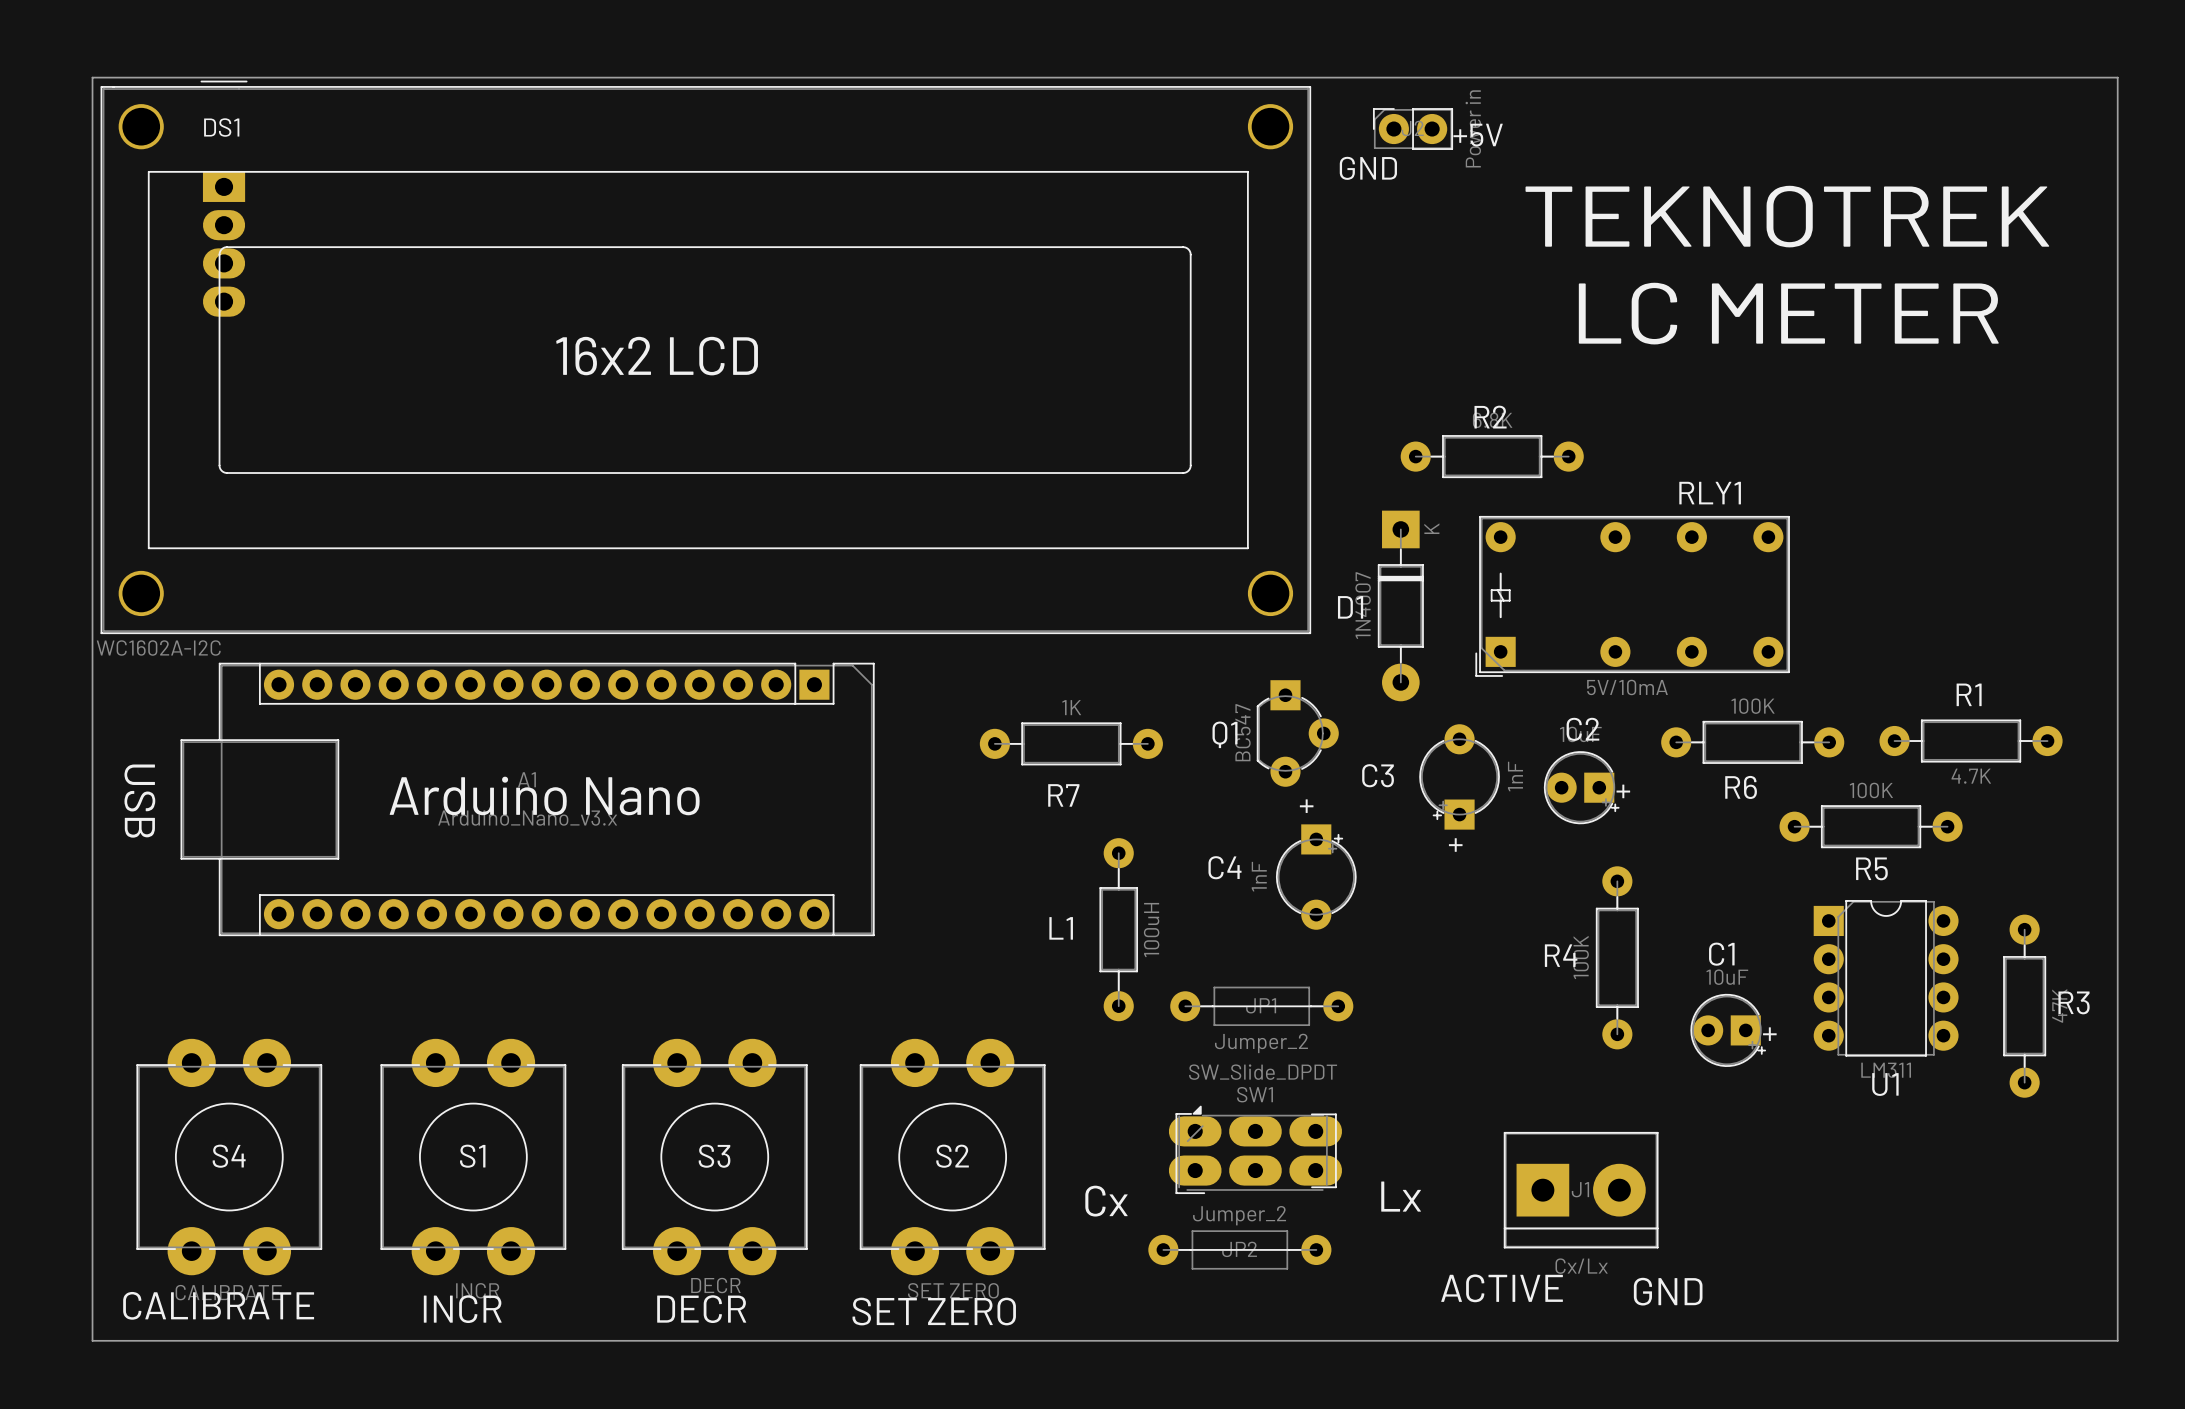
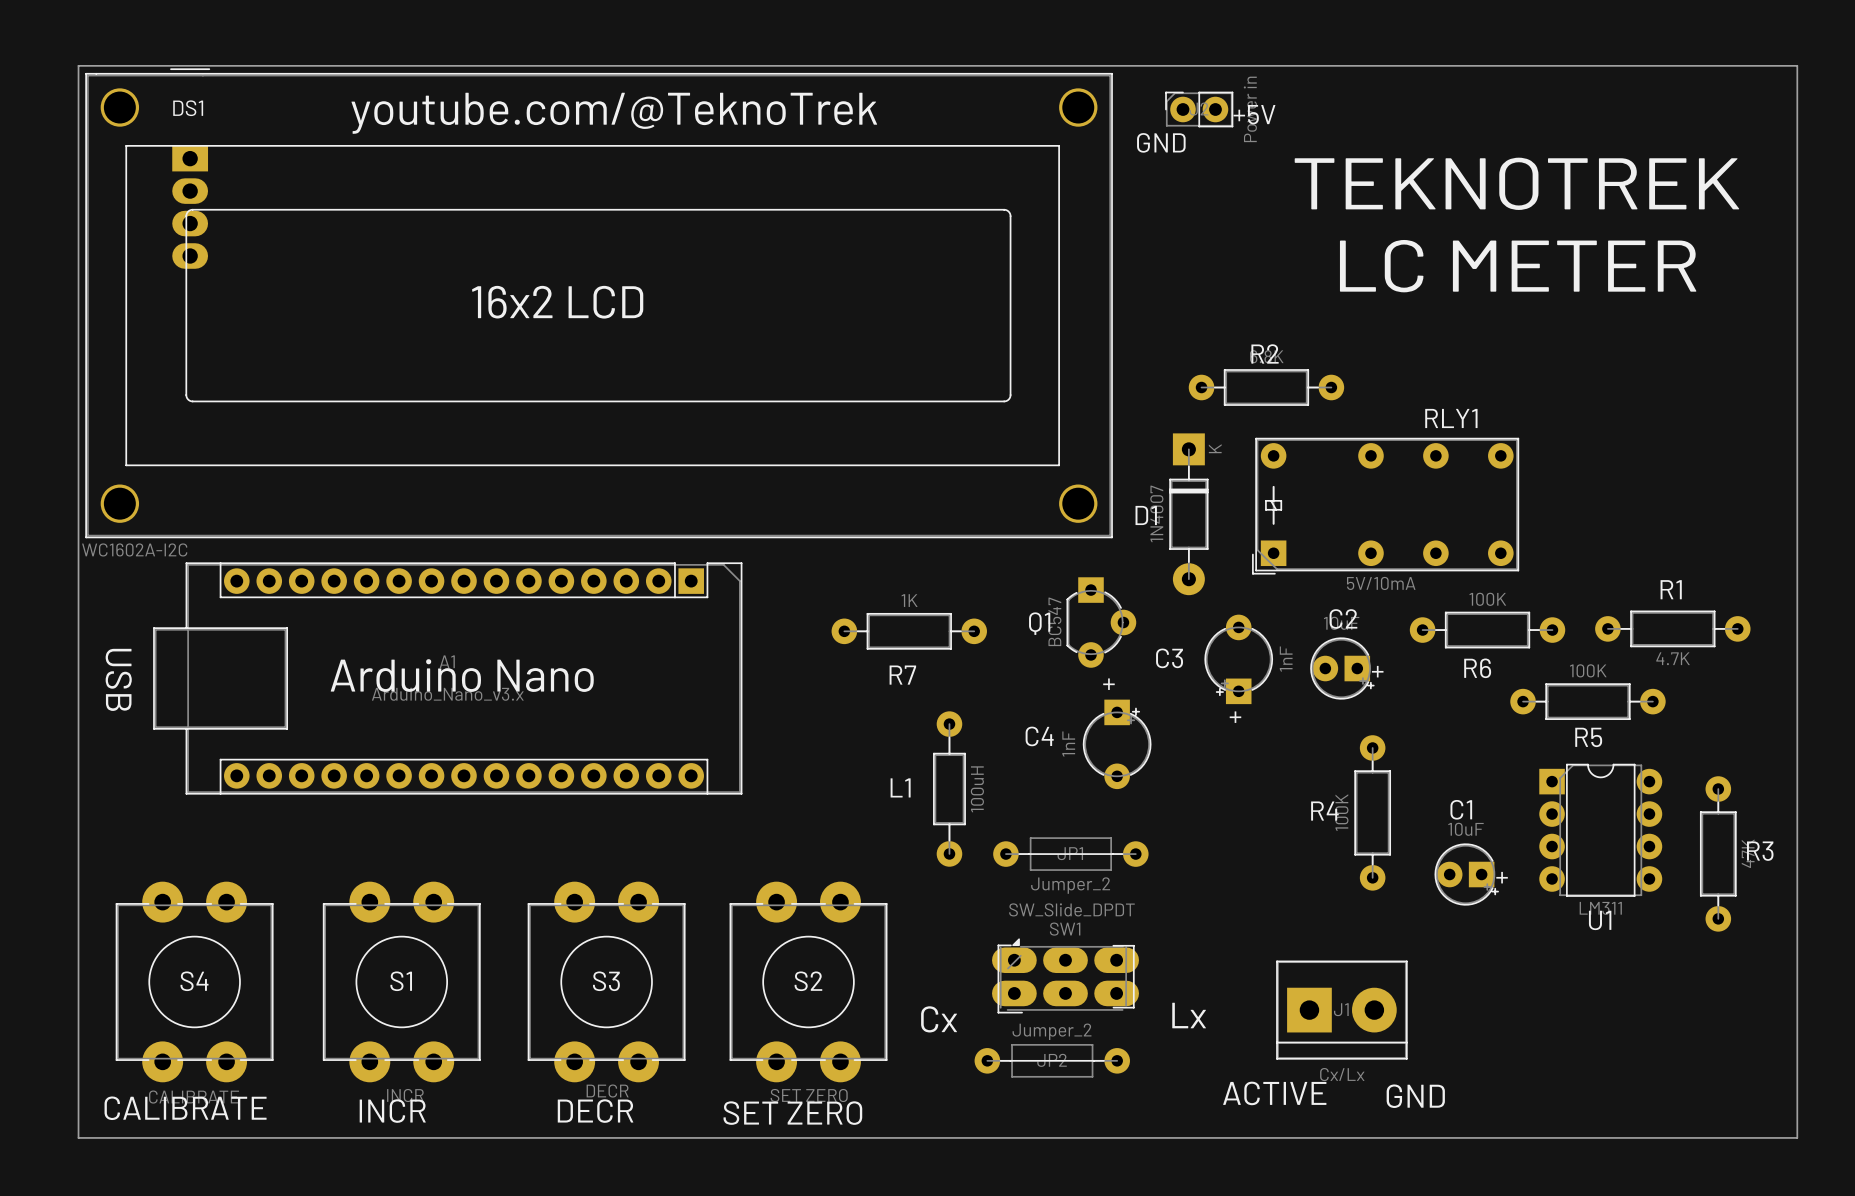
text: none -> youtube.com/@TeknoTrek (614, 113)

